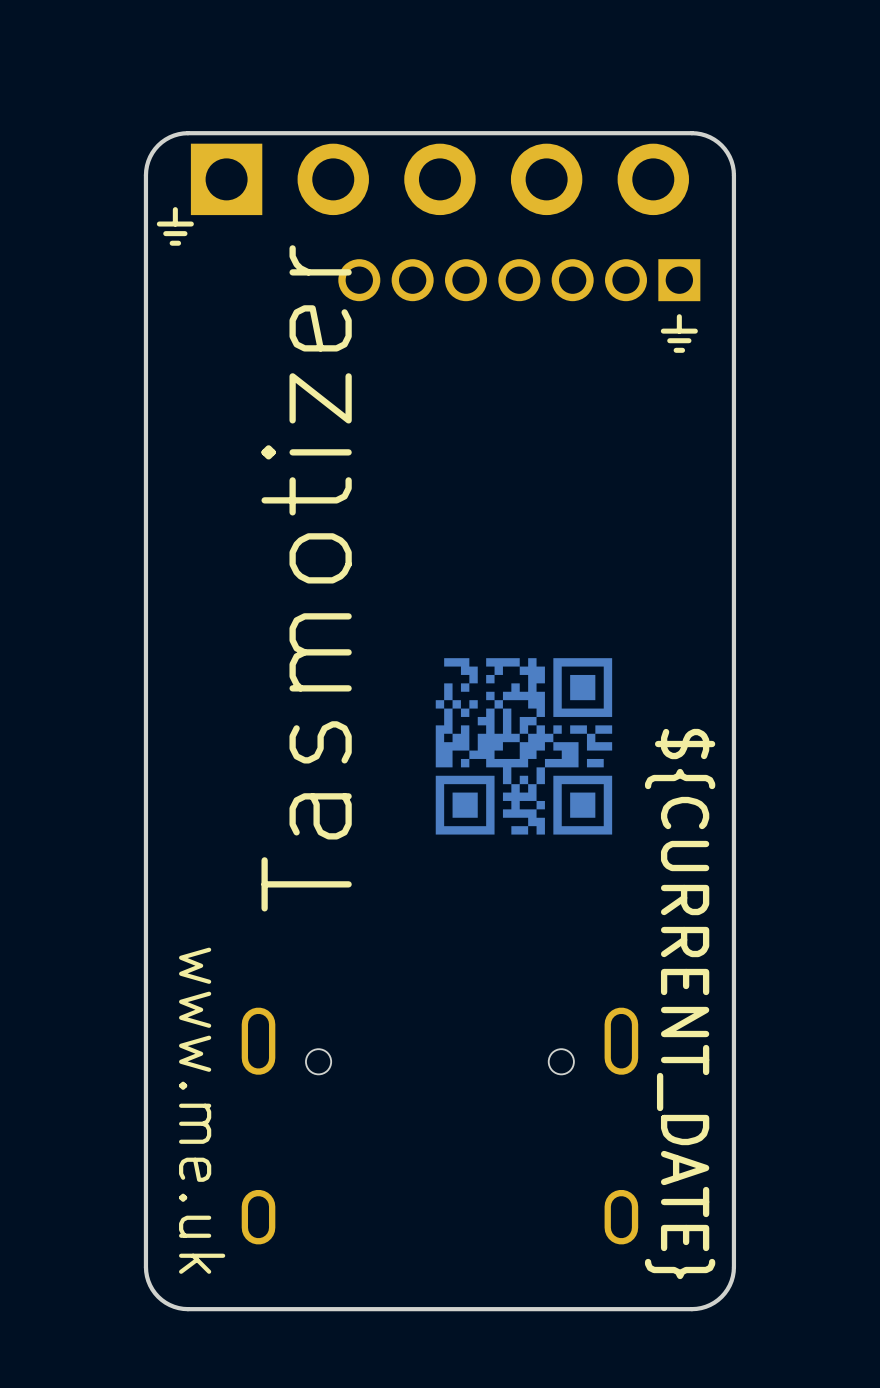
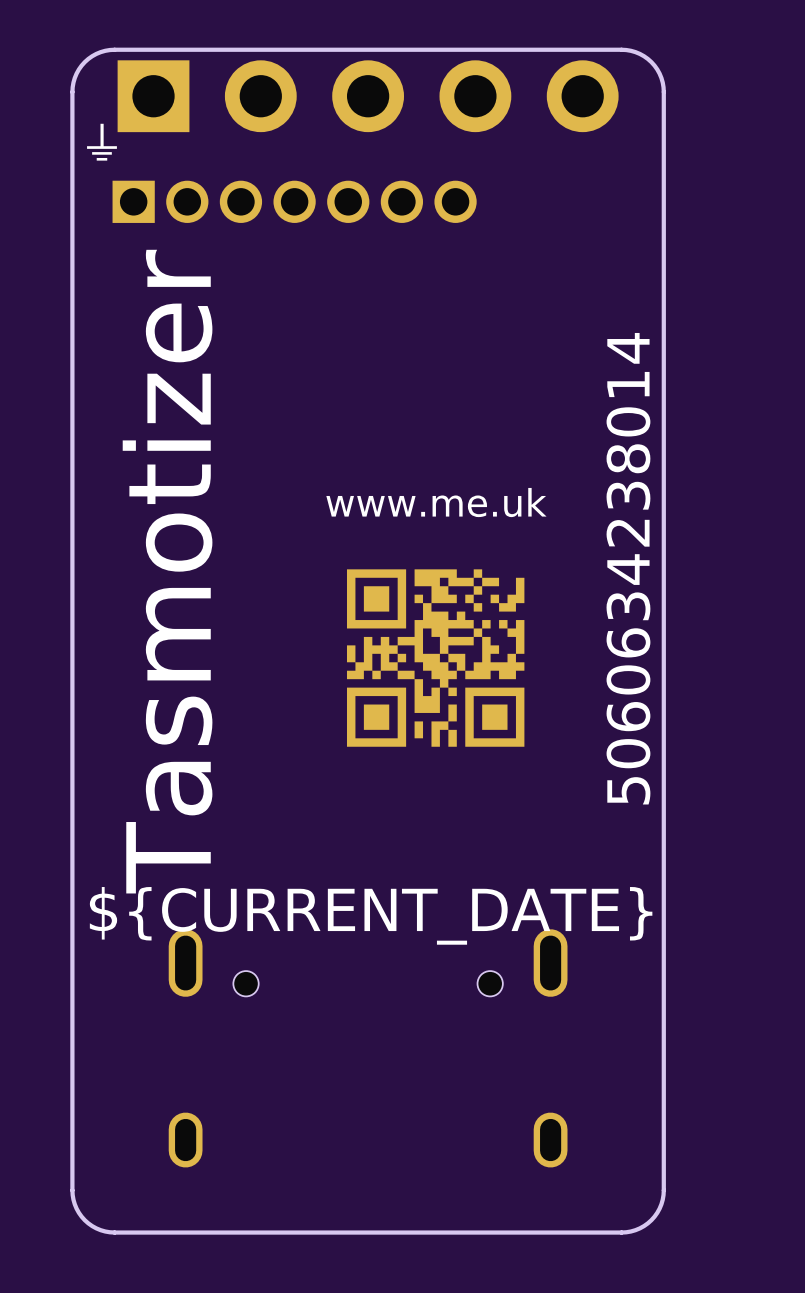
part side: top (519, 280) -> bottom (294, 201)
text: ⏚ (679, 333) -> none
drawing: none -> [326, 487, 547, 518]
text position: Tasmotizer (306, 578) -> Tasmotizer (167, 571)
text: none -> 5060634238014 (628, 568)
part rotation: 0° (523, 746) -> 90° clockwise (435, 658)
drawing: [179, 947, 226, 1274] -> none
text rotation: 0° (680, 1004) -> 90° counterclockwise (371, 915)

